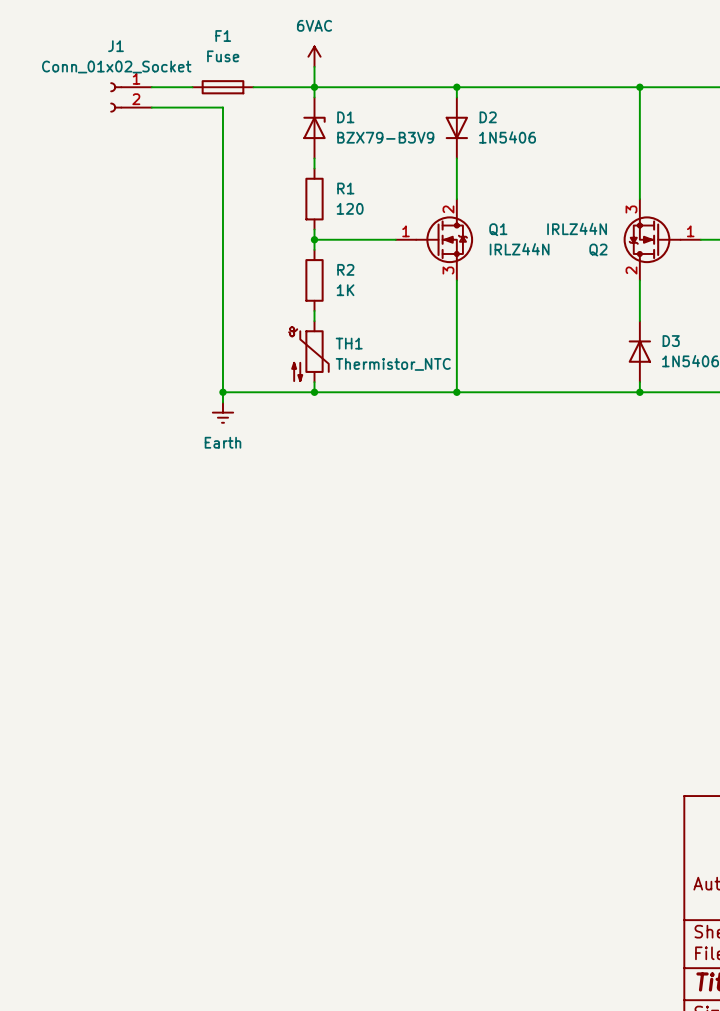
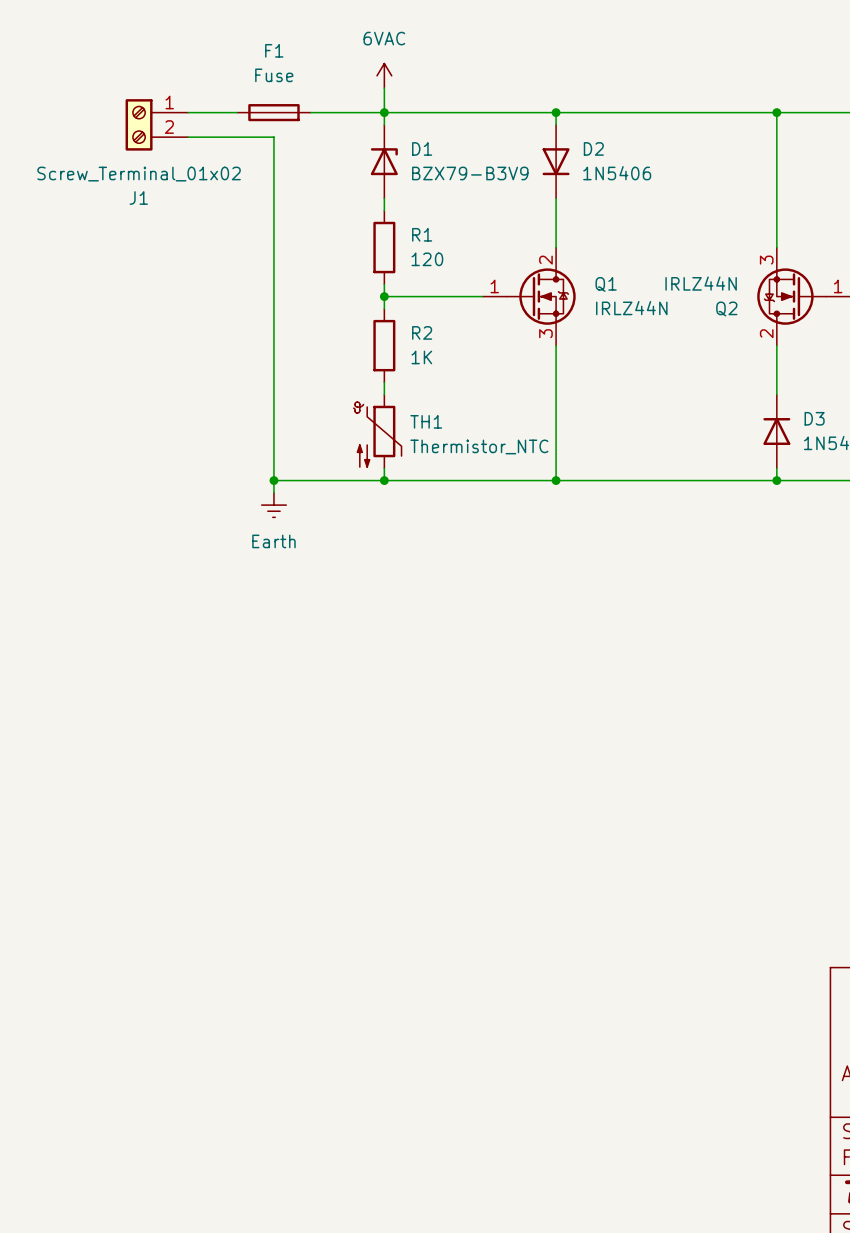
J1 name position: J1 (115, 46) -> J1 (138, 198)
J1 value: Conn_01x02_Socket (116, 67) -> Screw_Terminal_01x02 (139, 174)
J1 symbol: [110, 82, 152, 113] -> [125, 99, 189, 151]

